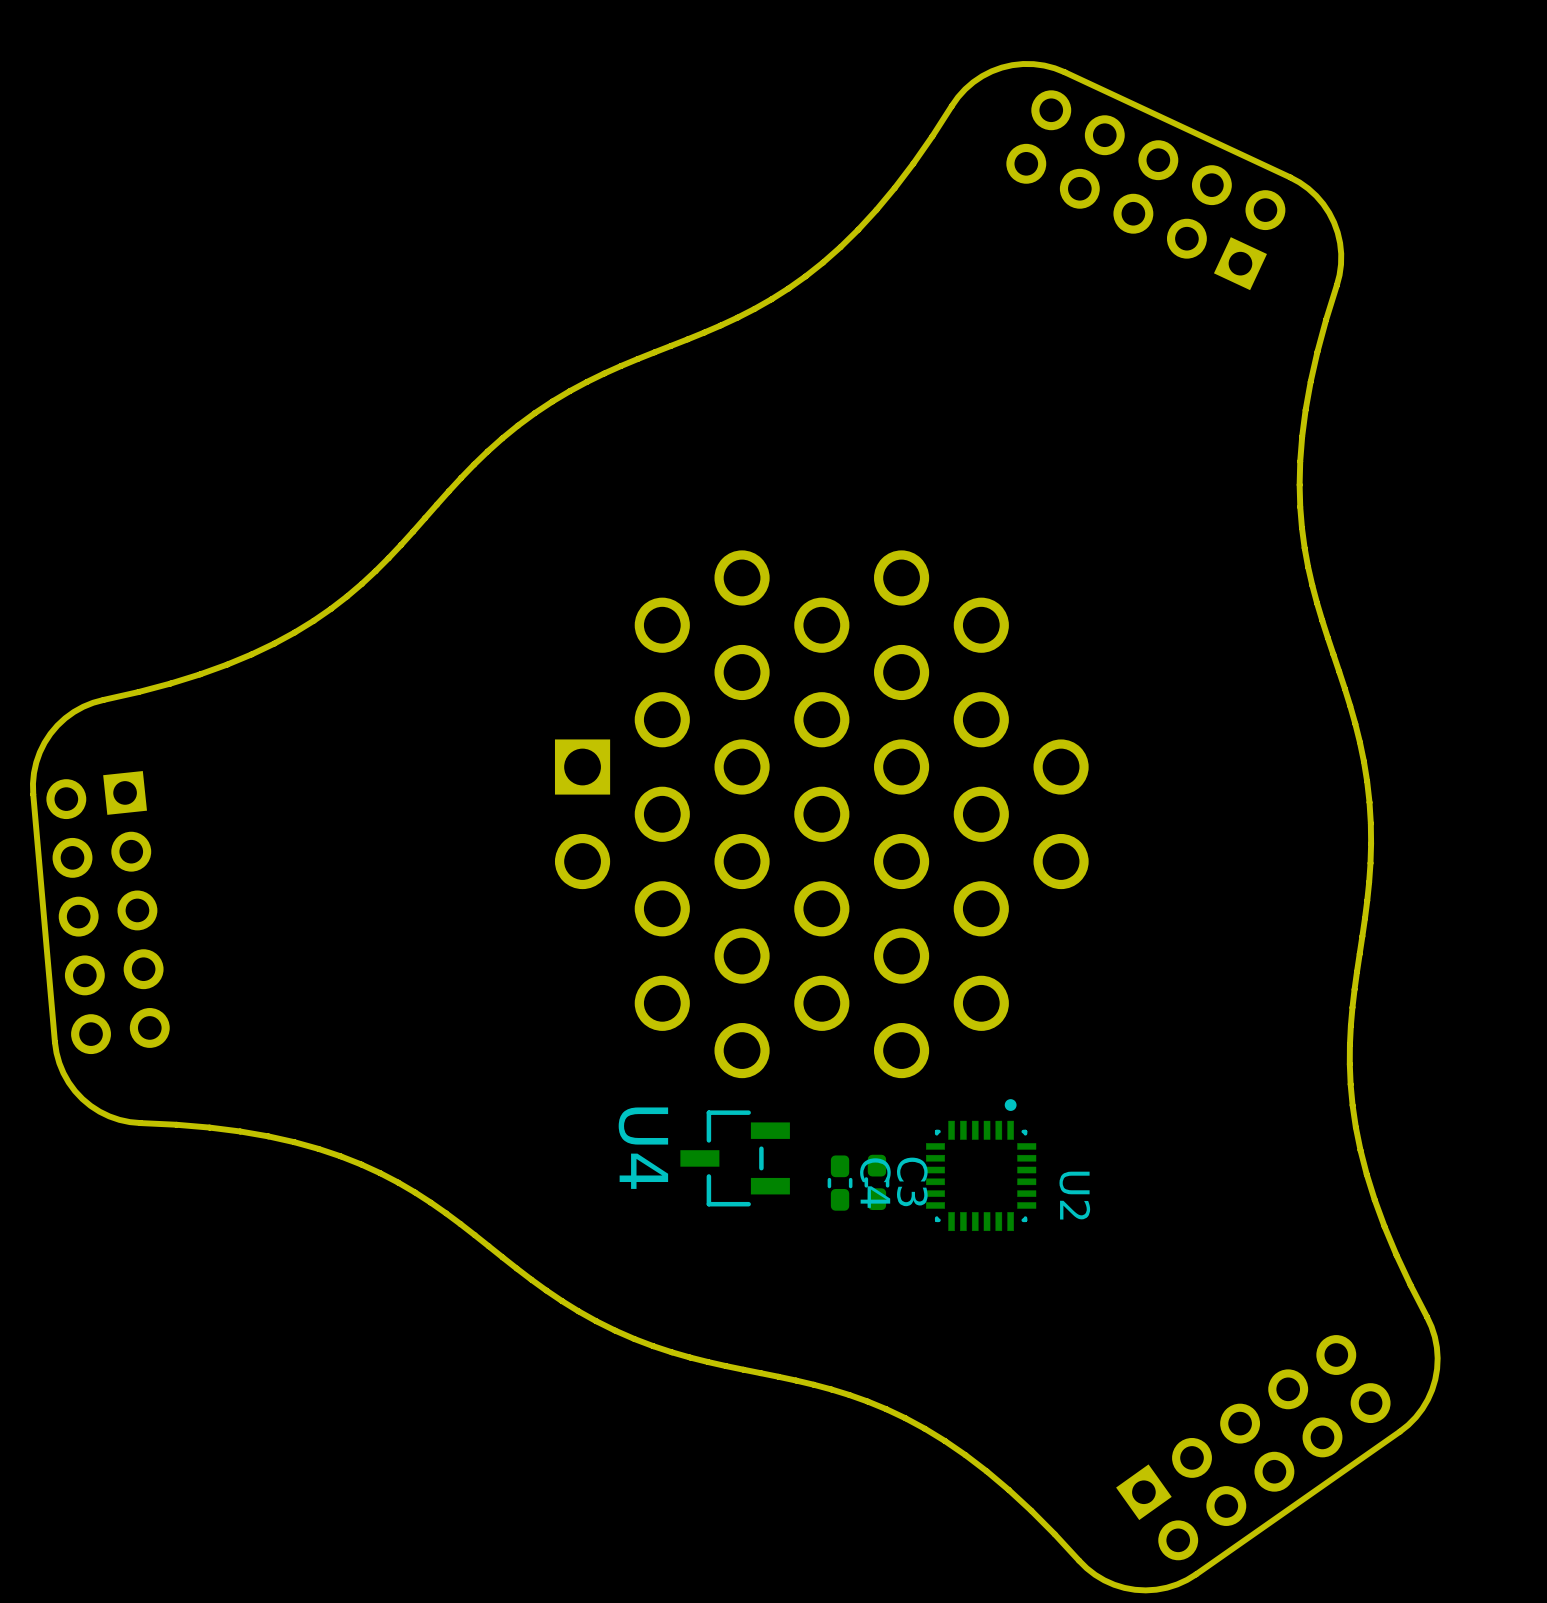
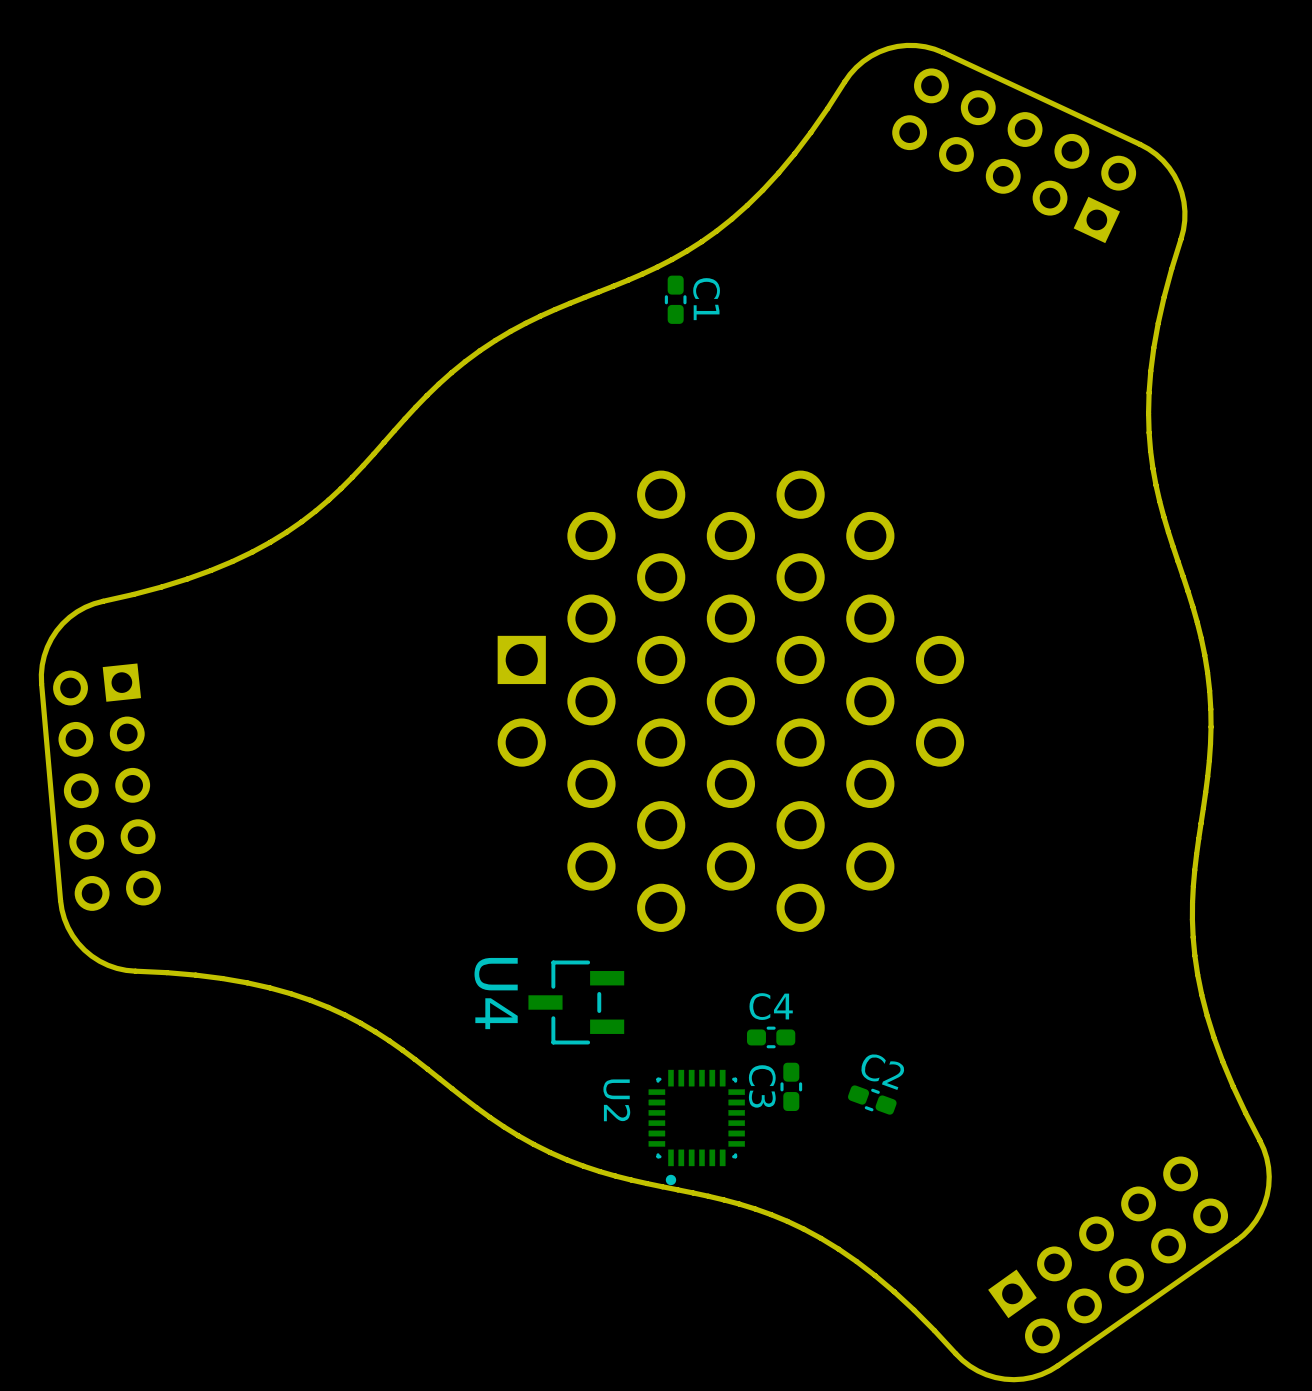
C1: none -> (675, 299)
U4 position: (735, 1158) -> (576, 1002)
U2 rotation: 0° (981, 1165) -> 180° (696, 1127)
U2 position: (981, 1165) -> (696, 1127)
C3 name position: C3 (912, 1181) -> C3 (762, 1086)
C3 position: (876, 1182) -> (791, 1086)
C4 rotation: 0° (840, 1183) -> 90° clockwise (771, 1037)
C2: none -> (872, 1100)

